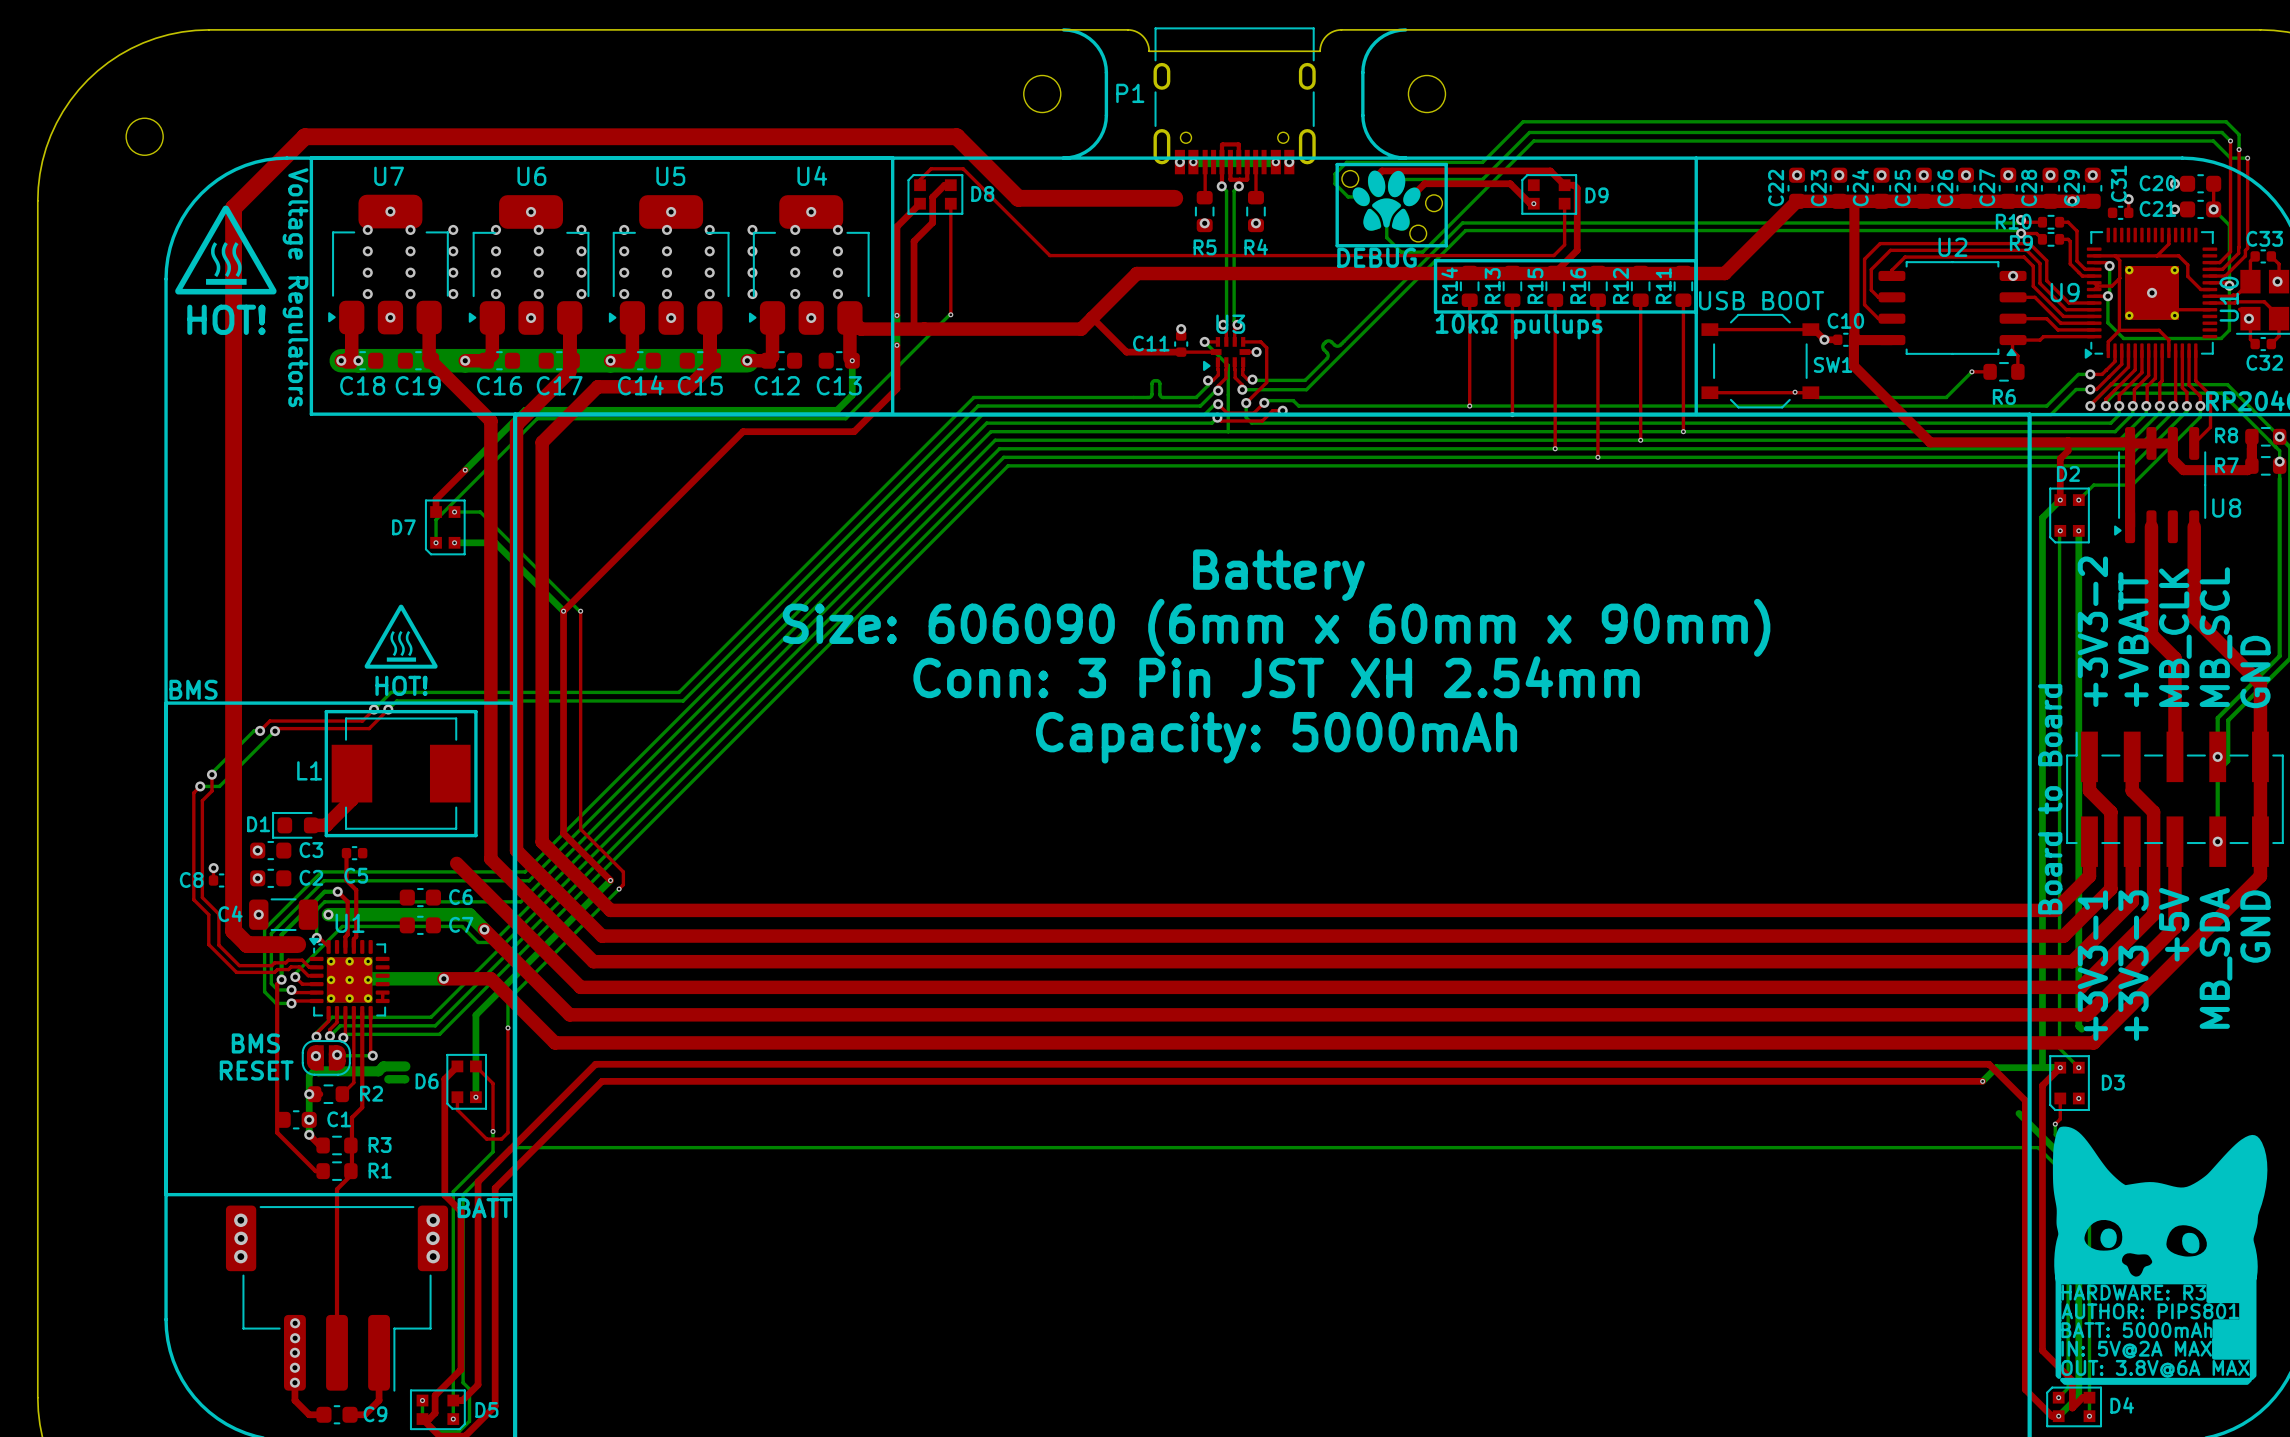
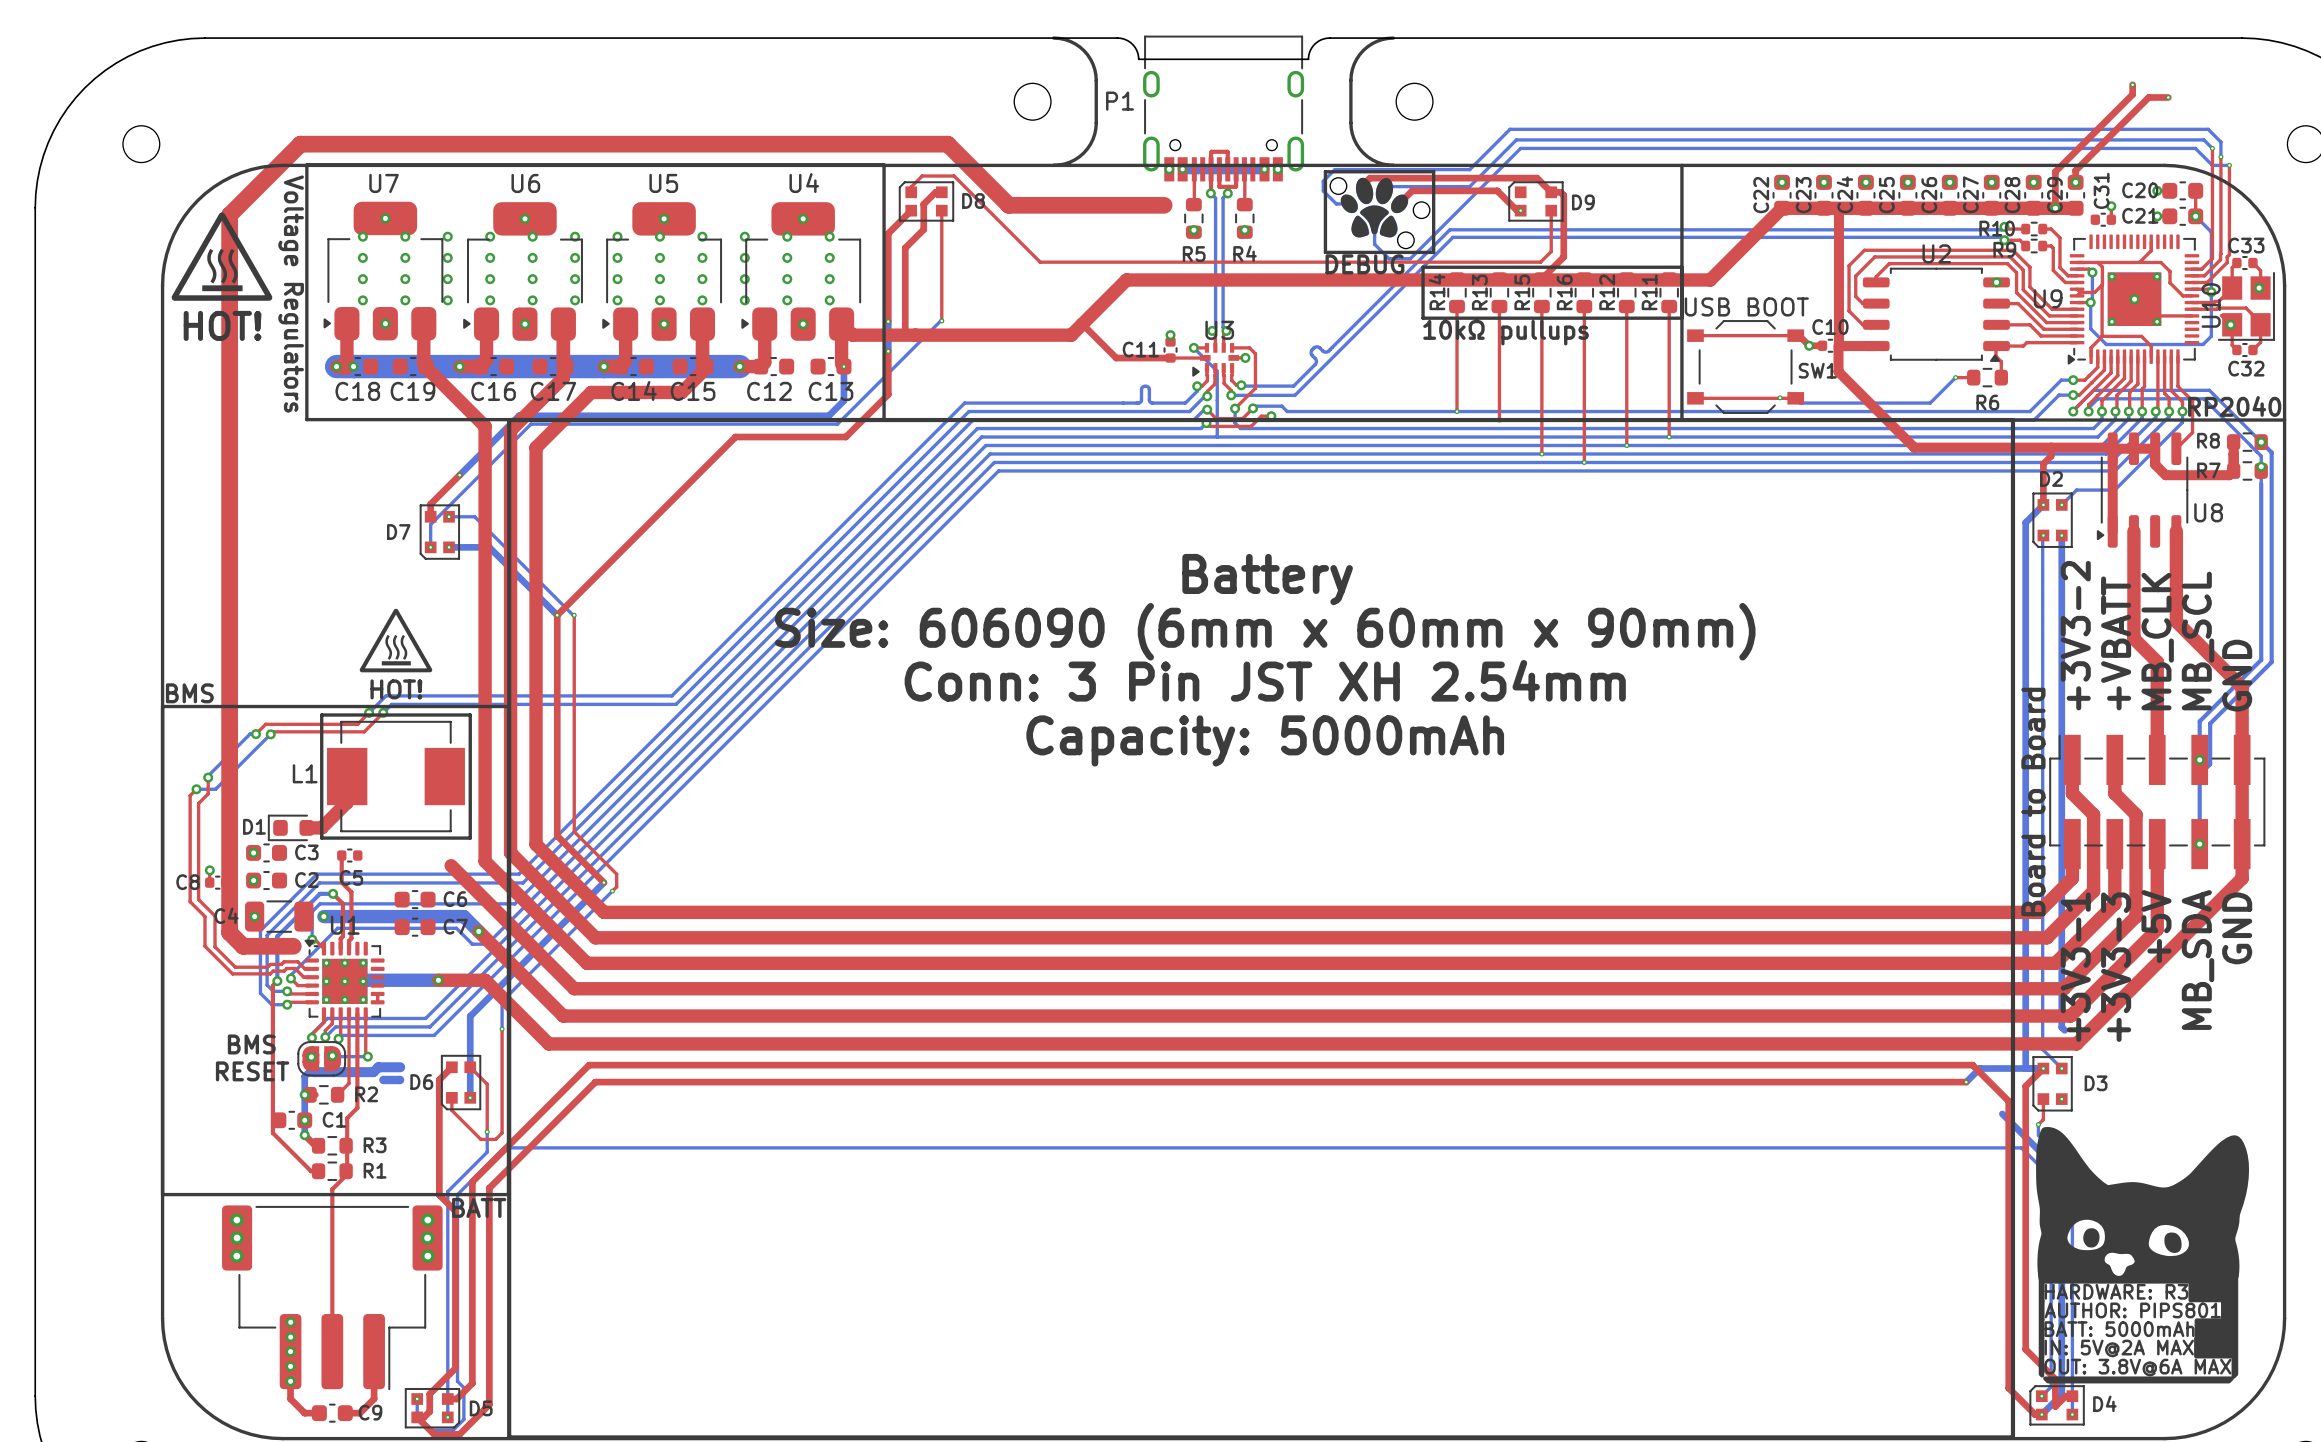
top track: none -> (2132, 84) (2132, 94) (2055, 171) (2055, 208)
via: none -> (2132, 84)
top track: none -> (2168, 97) (2148, 97) (2075, 170) (2075, 182)
via: none -> (2168, 97)

